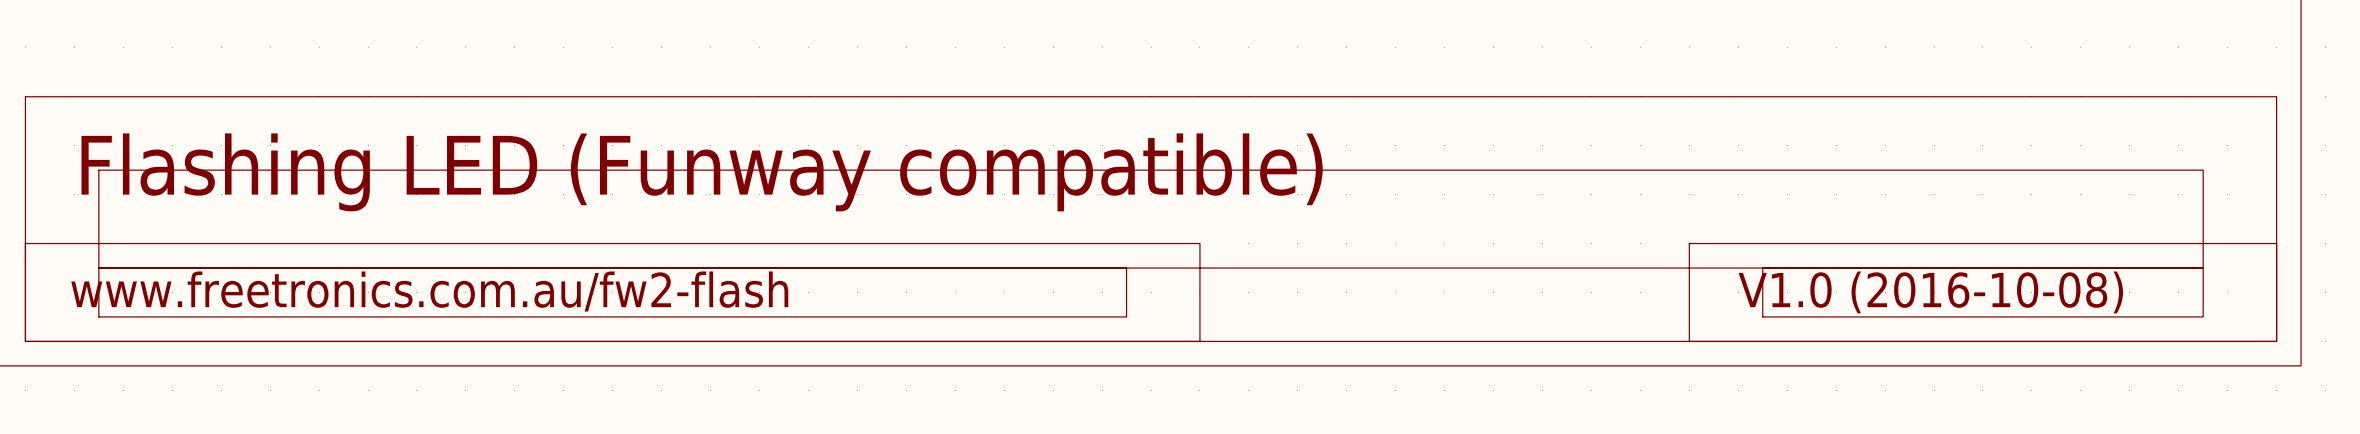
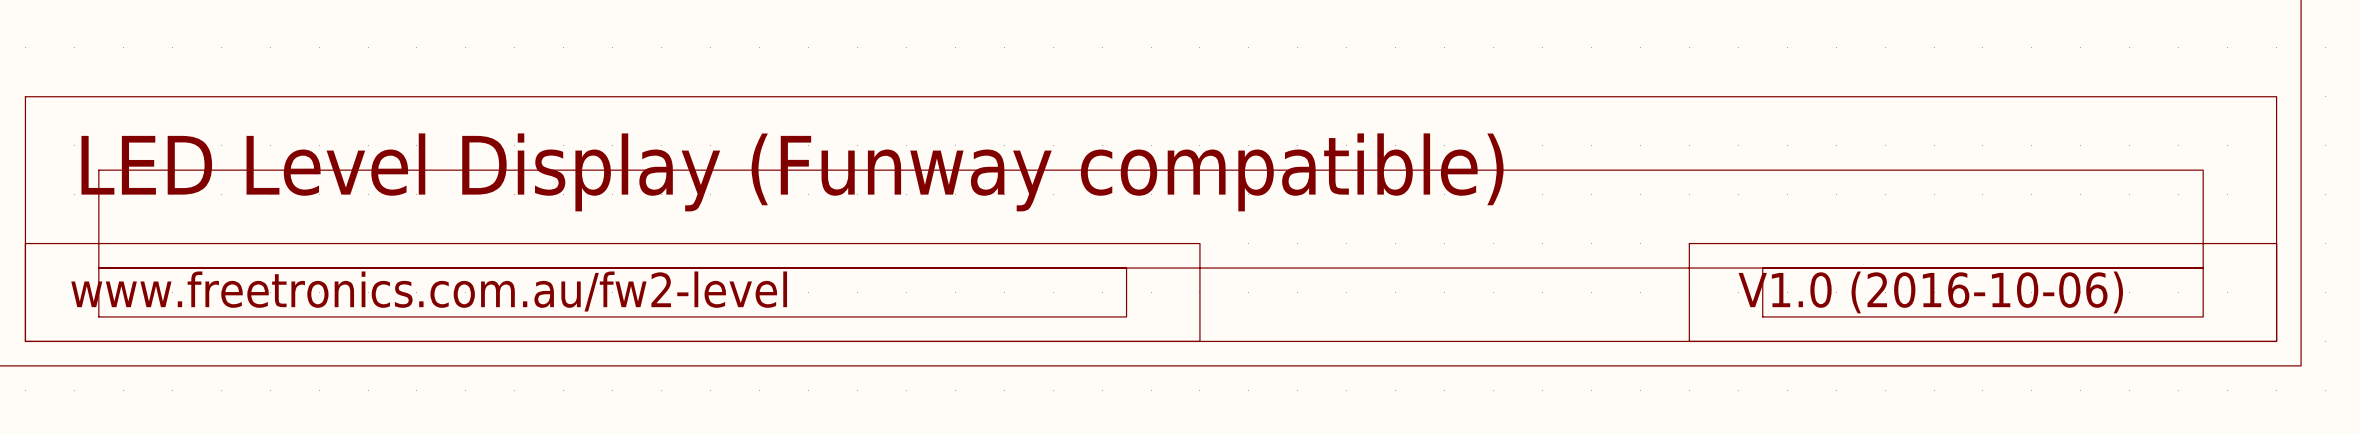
text: Flashing LED (Funway compatible) (702, 172) -> LED Level Display (Funway compatible) (792, 172)
text: www.freetronics.com.au/fw2-flash (429, 291) -> www.freetronics.com.au/fw2-level (429, 291)
text: V1.0 (2016-10-08) (1930, 292) -> V1.0 (2016-10-06) (1930, 292)

